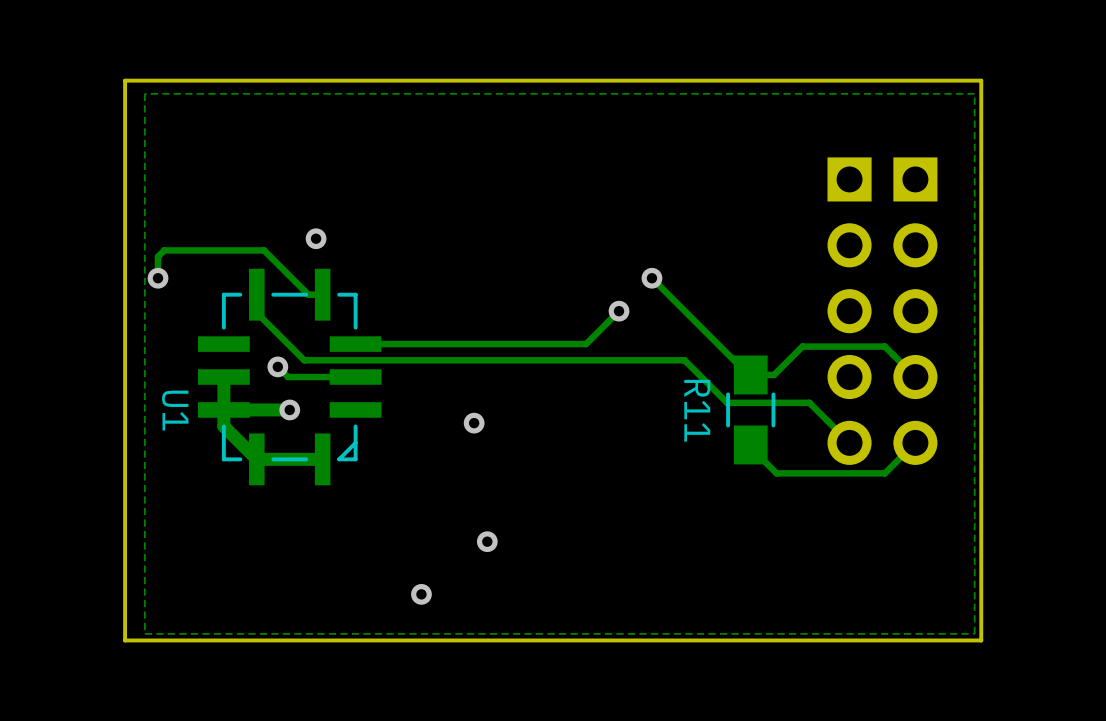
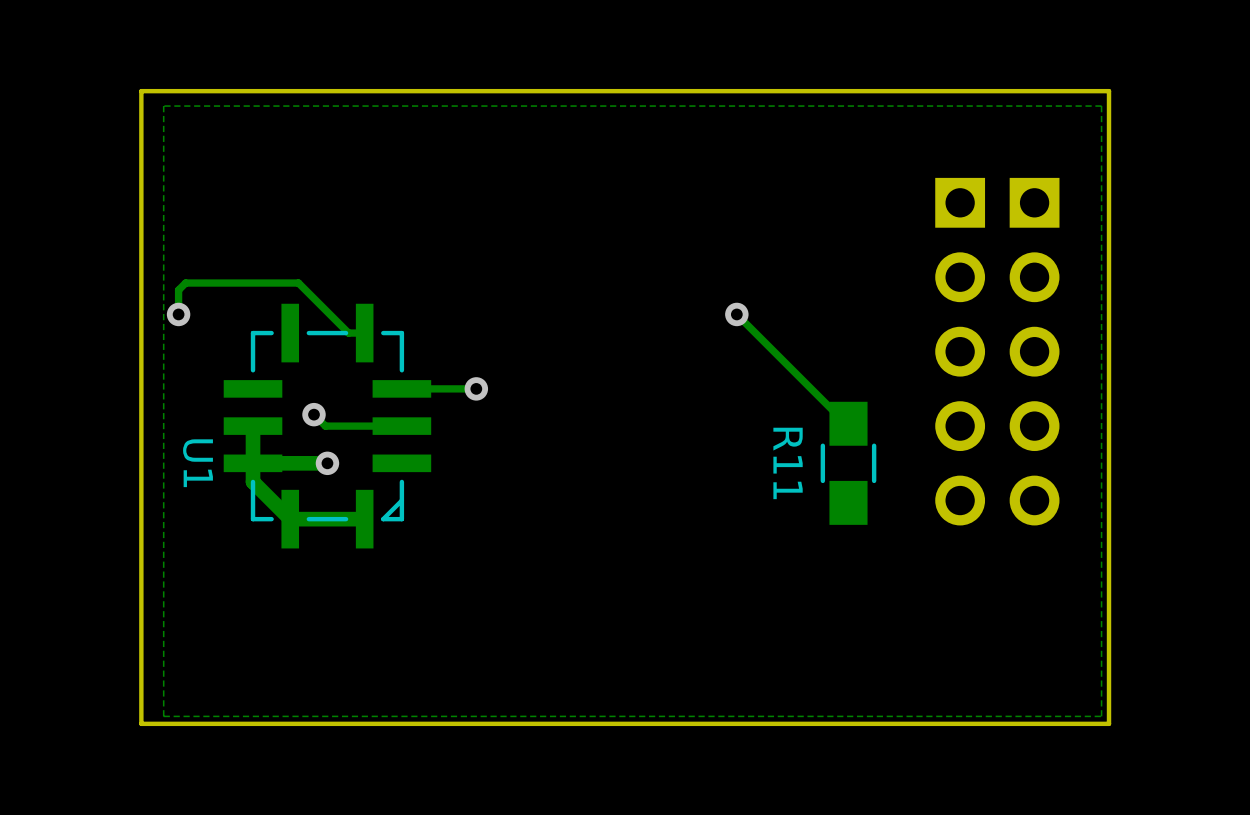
via: (316, 238) -> none
track: (619, 311) (586, 344) (421, 344) -> none
via: (619, 311) -> none
track: (256, 312) (304, 360) (684, 360) (727, 402) (809, 402) (849, 442) -> none
via: none -> (476, 388)
track: (750, 374) (774, 374) (802, 346) (884, 346) (915, 377) -> none
via: (474, 423) -> none
track: (915, 442) (884, 473) (776, 473) (750, 447) -> none
via: (487, 541) -> none
via: (421, 594) -> none

